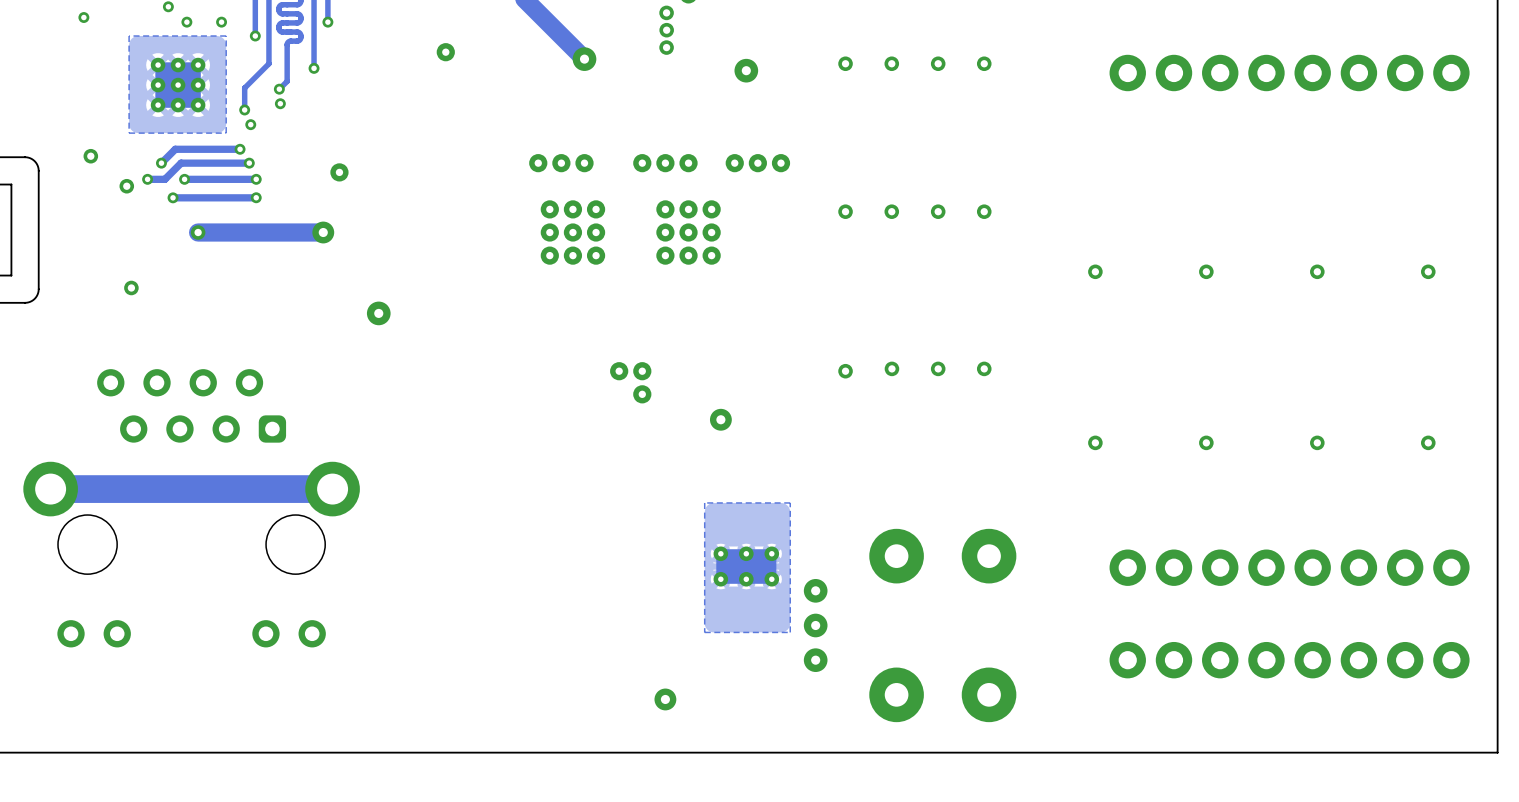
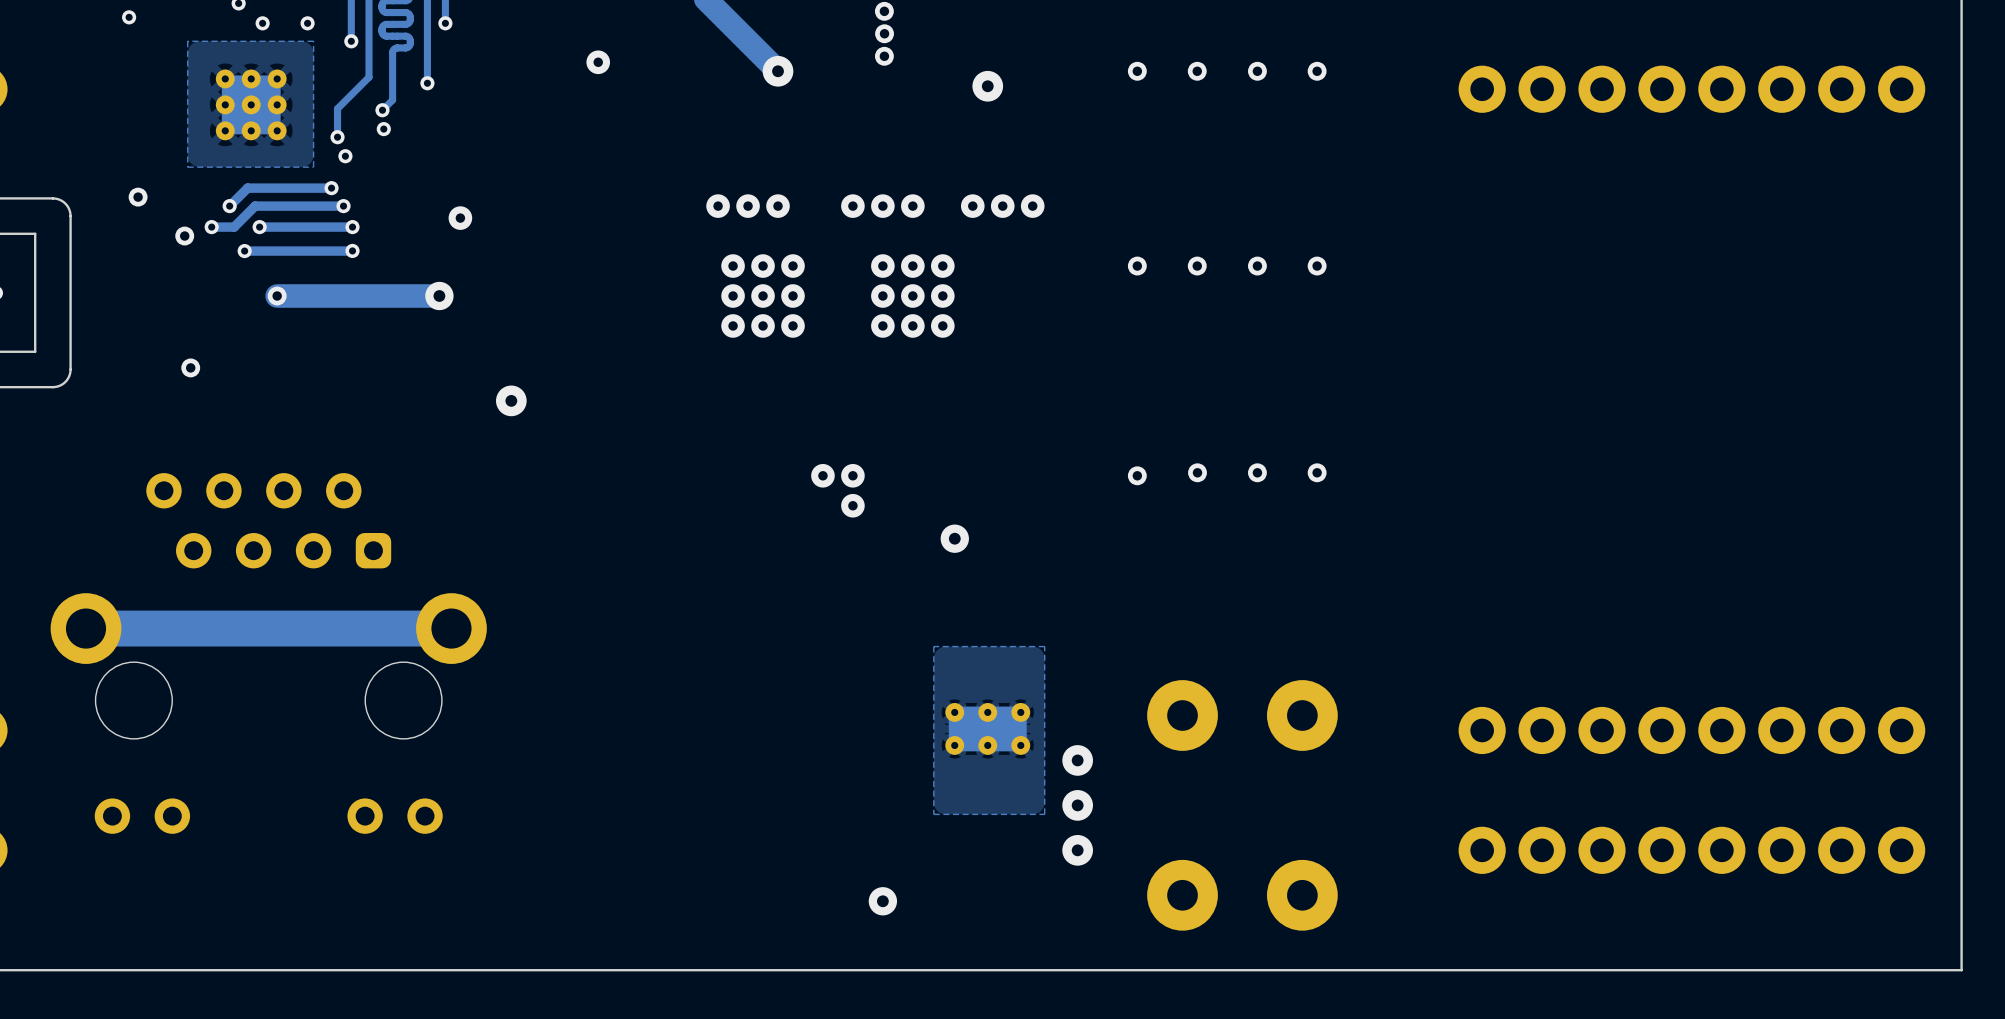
via: none -> (1137, 71)
via: none -> (1197, 71)
via: none -> (1257, 71)
via: none -> (1317, 71)
via: (845, 63) -> none
via: (891, 63) -> none
via: (938, 63) -> none
via: (984, 63) -> none
via: none -> (1137, 266)
via: none -> (1197, 266)
via: none -> (1257, 266)
via: none -> (1317, 266)
via: (845, 211) -> none
via: (891, 211) -> none
via: (938, 211) -> none
via: (984, 211) -> none
via: (1095, 271) -> none
via: (1206, 271) -> none
via: (1317, 271) -> none
via: (1428, 271) -> none
via: (891, 368) -> none
via: none -> (1197, 472)
via: (938, 368) -> none
via: none -> (1257, 472)
via: (984, 368) -> none
via: none -> (1317, 472)
via: (845, 371) -> none
via: none -> (1137, 475)
via: (1095, 442) -> none
via: (1206, 442) -> none
via: (1317, 442) -> none
via: (1428, 442) -> none

